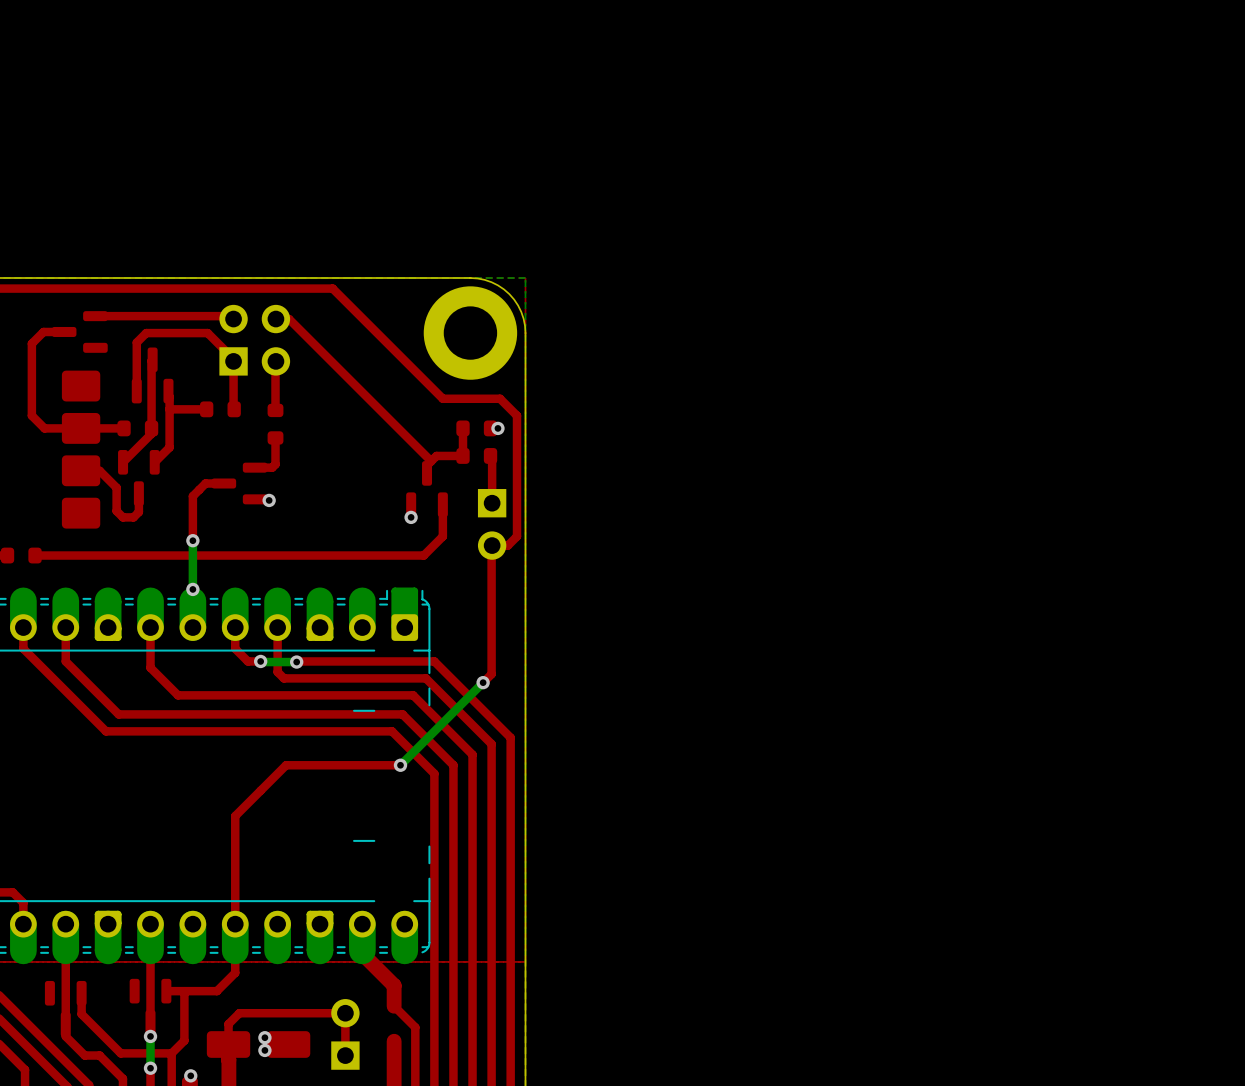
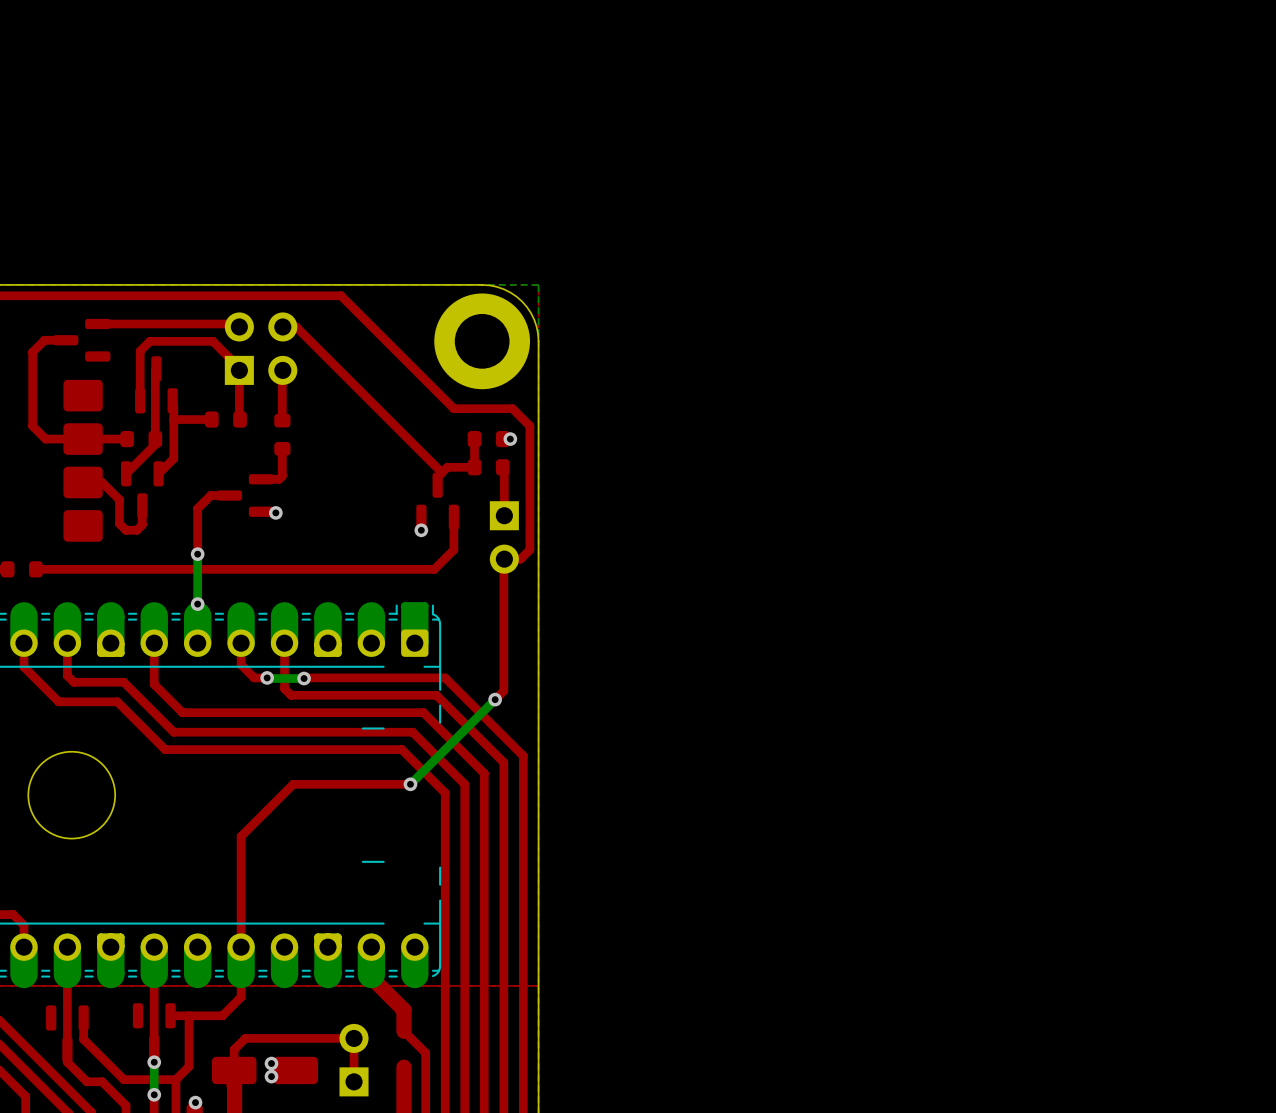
top track: (23, 648) (106, 731) (161, 731) -> (23, 664) (58, 701) (117, 701) (165, 749)
top track: (65, 659) (118, 714) (169, 714) -> (67, 675) (73, 682) (123, 682) (173, 732)
round board edge: none -> [27, 751, 116, 840]

